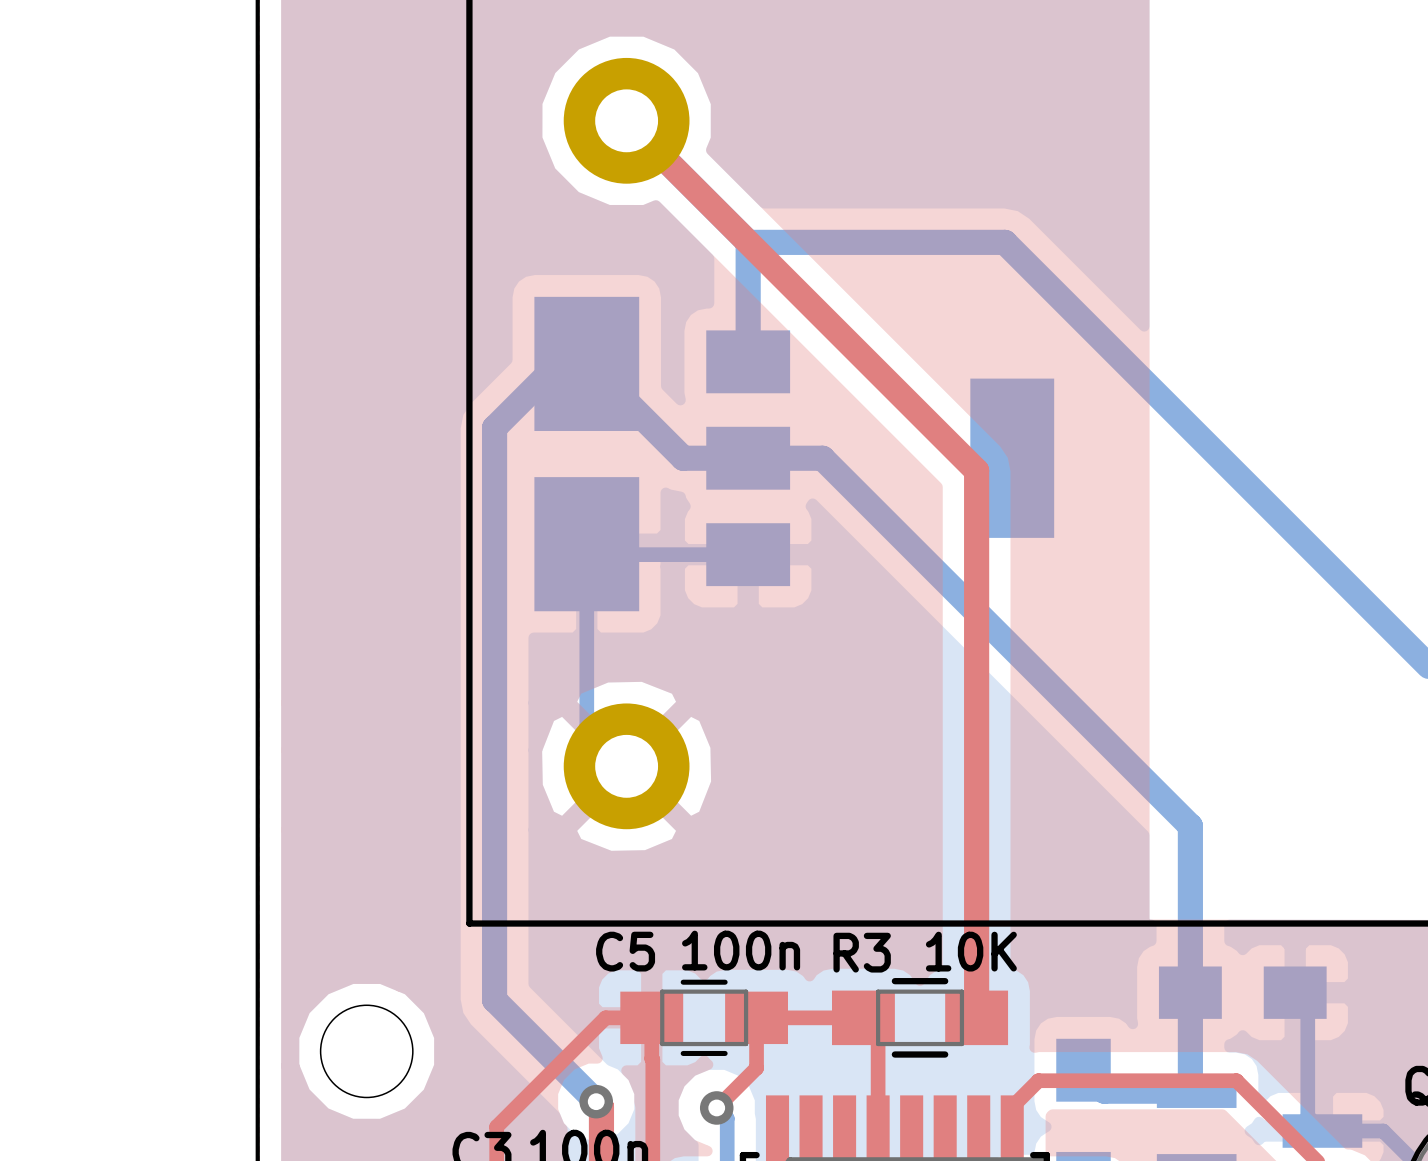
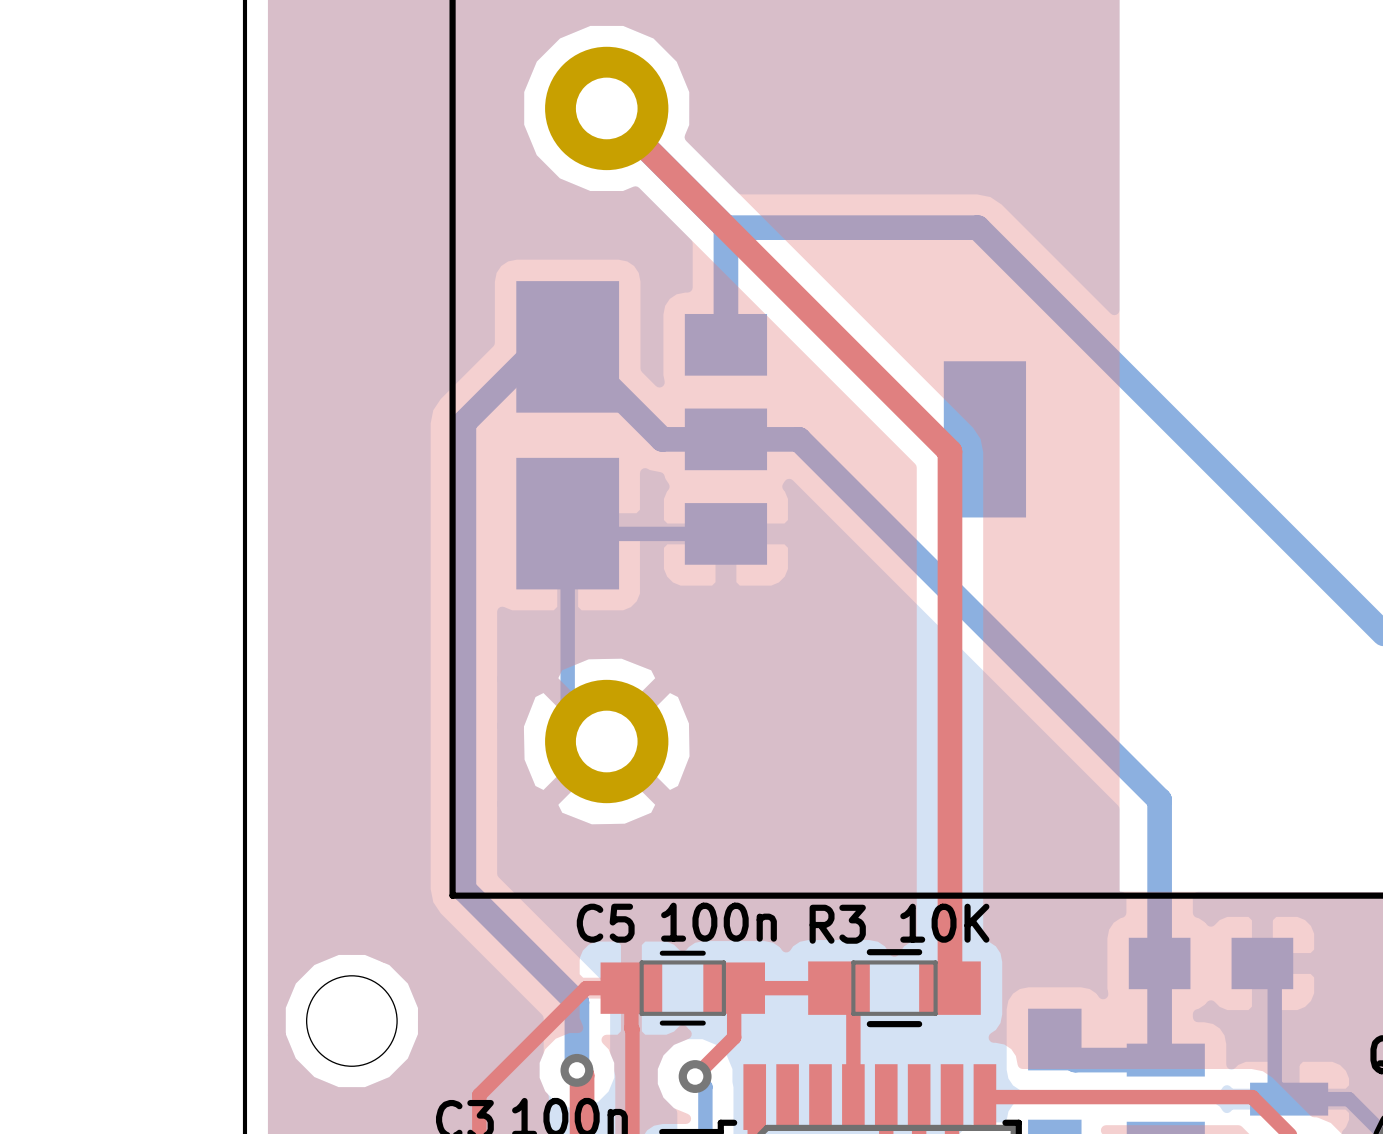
bottom track: (494, 427) (494, 1000) (596, 1101) -> (477, 409) (463, 422) (463, 889) (576, 1002) (576, 1070)
top track: (1012, 1128) (1012, 1106) (1038, 1080) (1236, 1080) (1284, 1128) -> (984, 1097) (1252, 1097)

